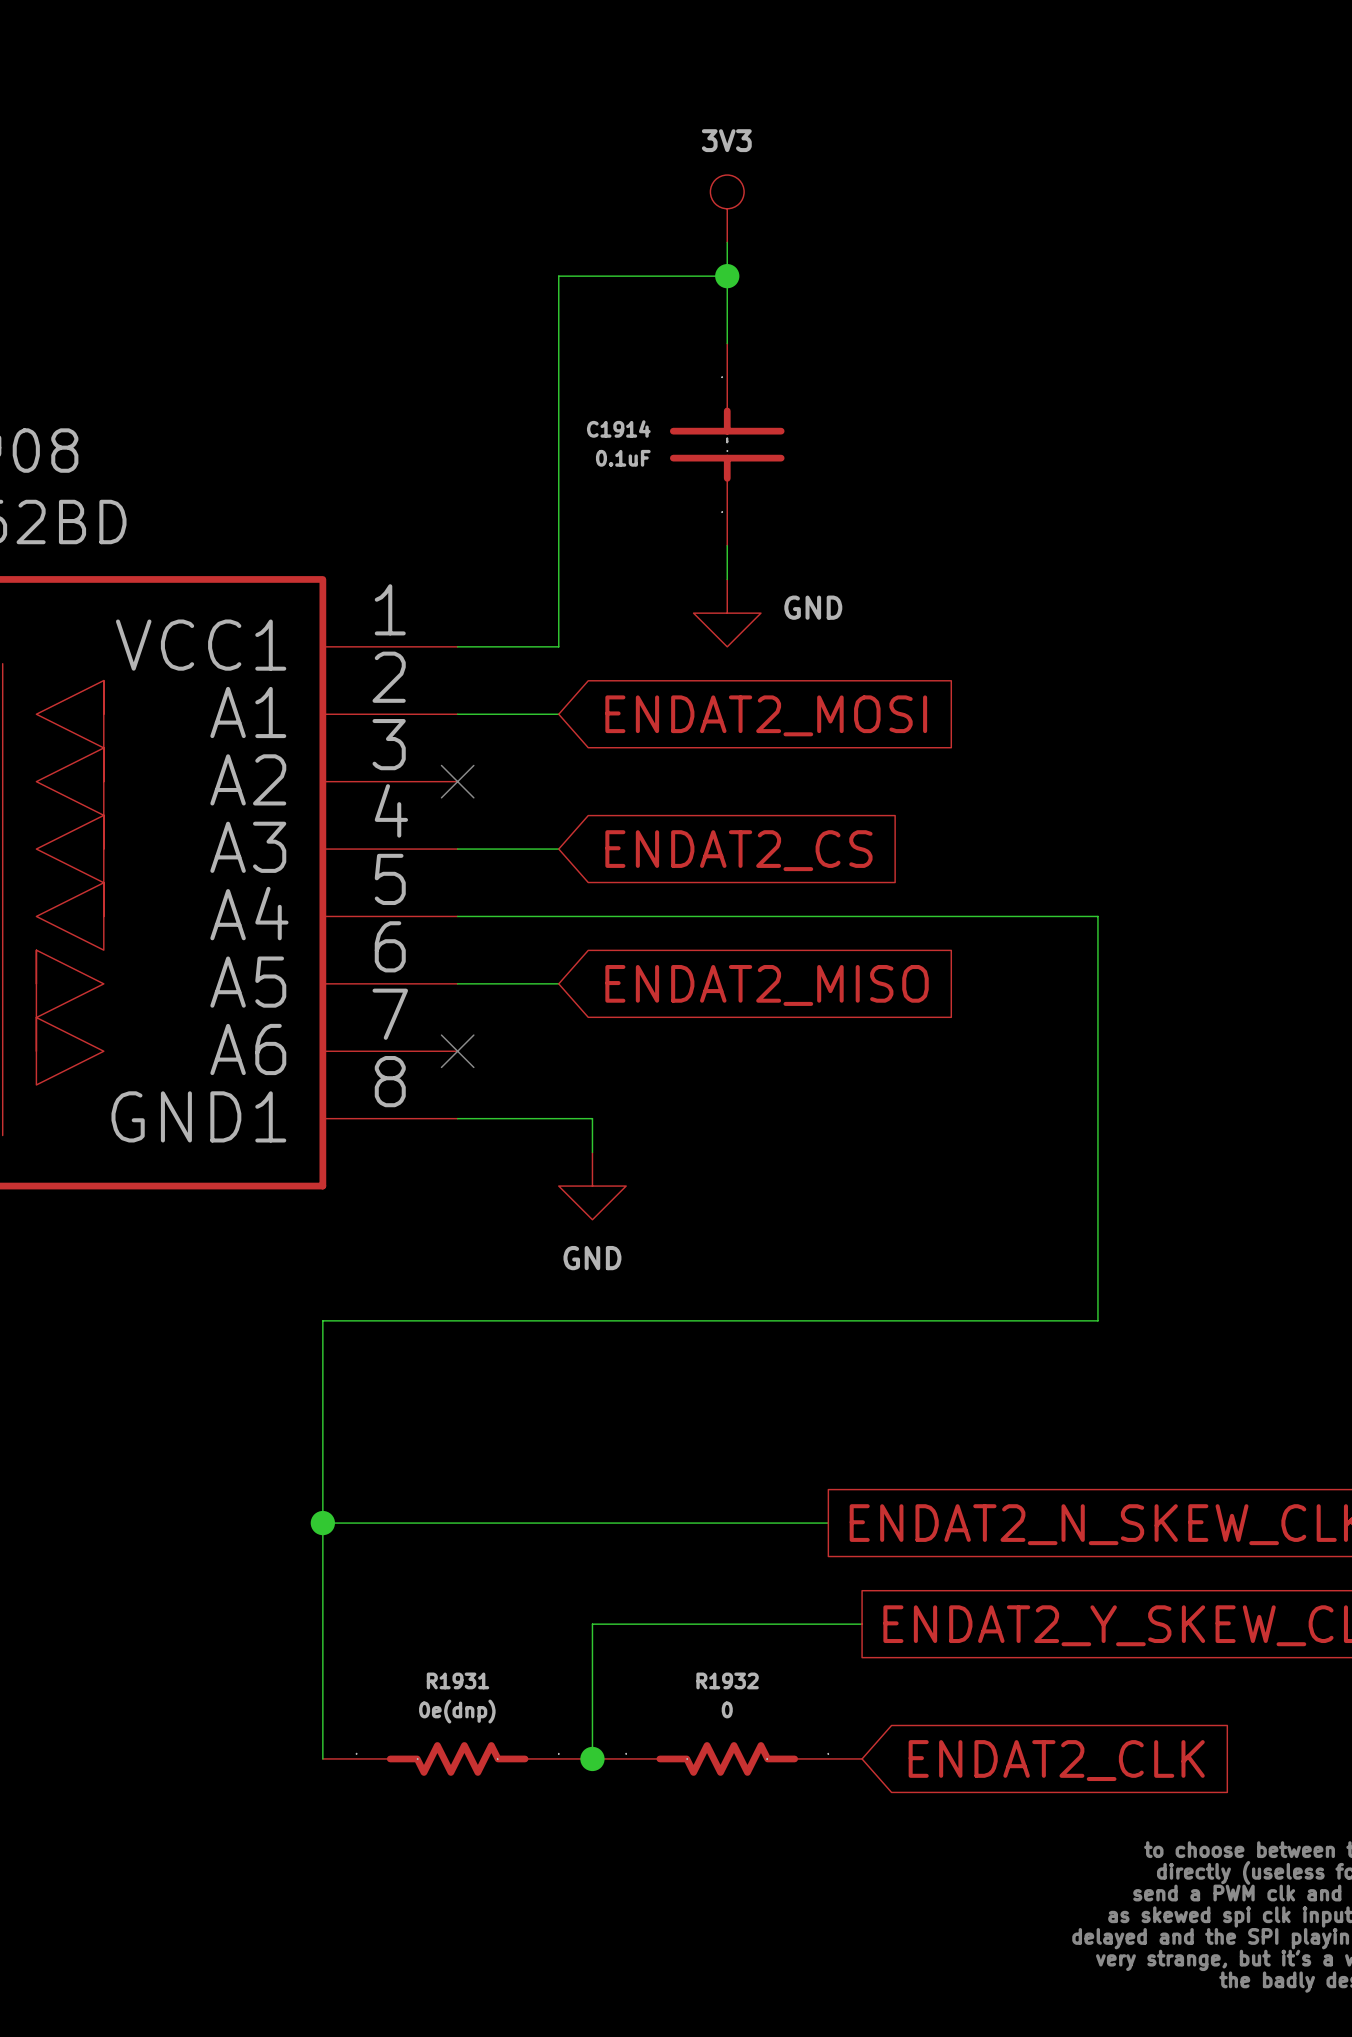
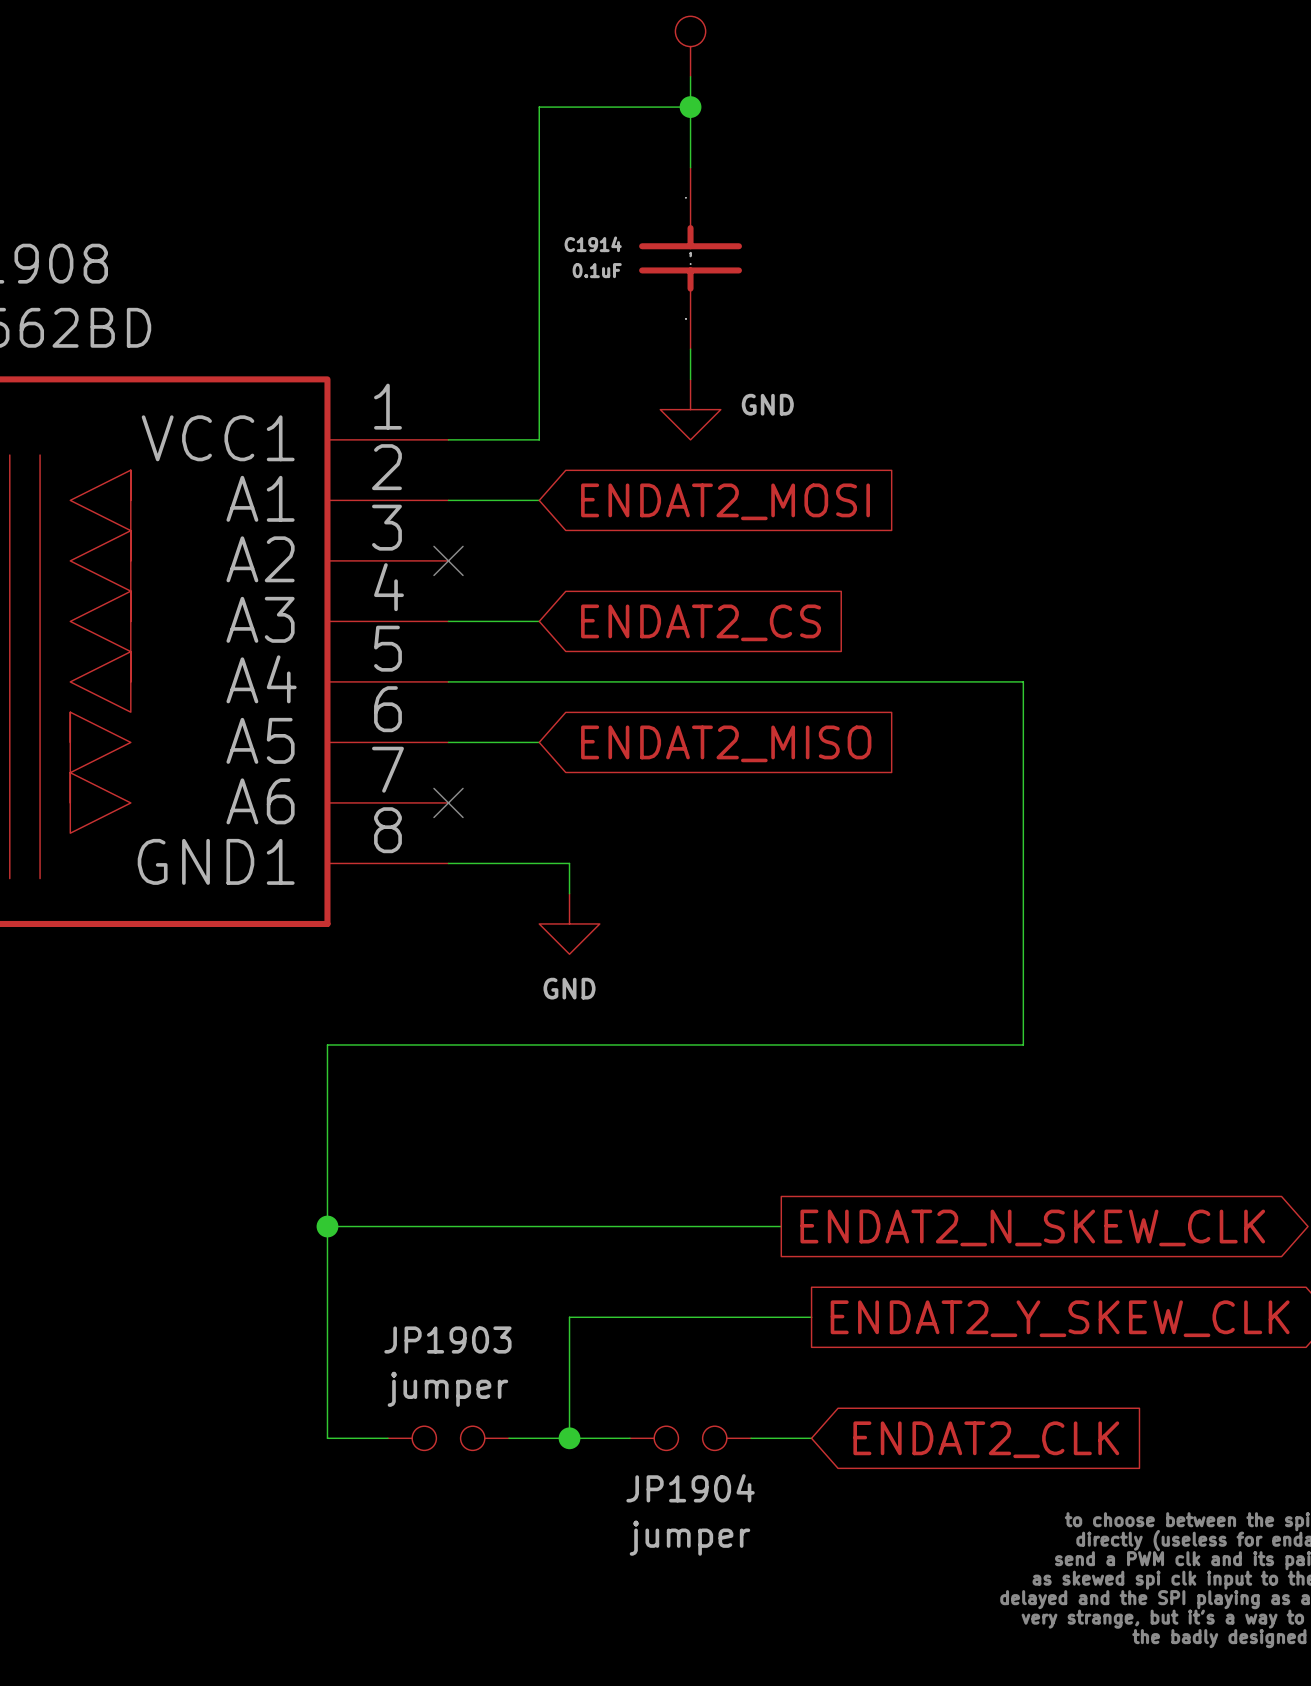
R1931: 0e(dnp) (457, 1758) -> none
JP1903: none -> jumper (448, 1438)
R1932: 0 (727, 1758) -> none
JP1904: none -> jumper (690, 1438)

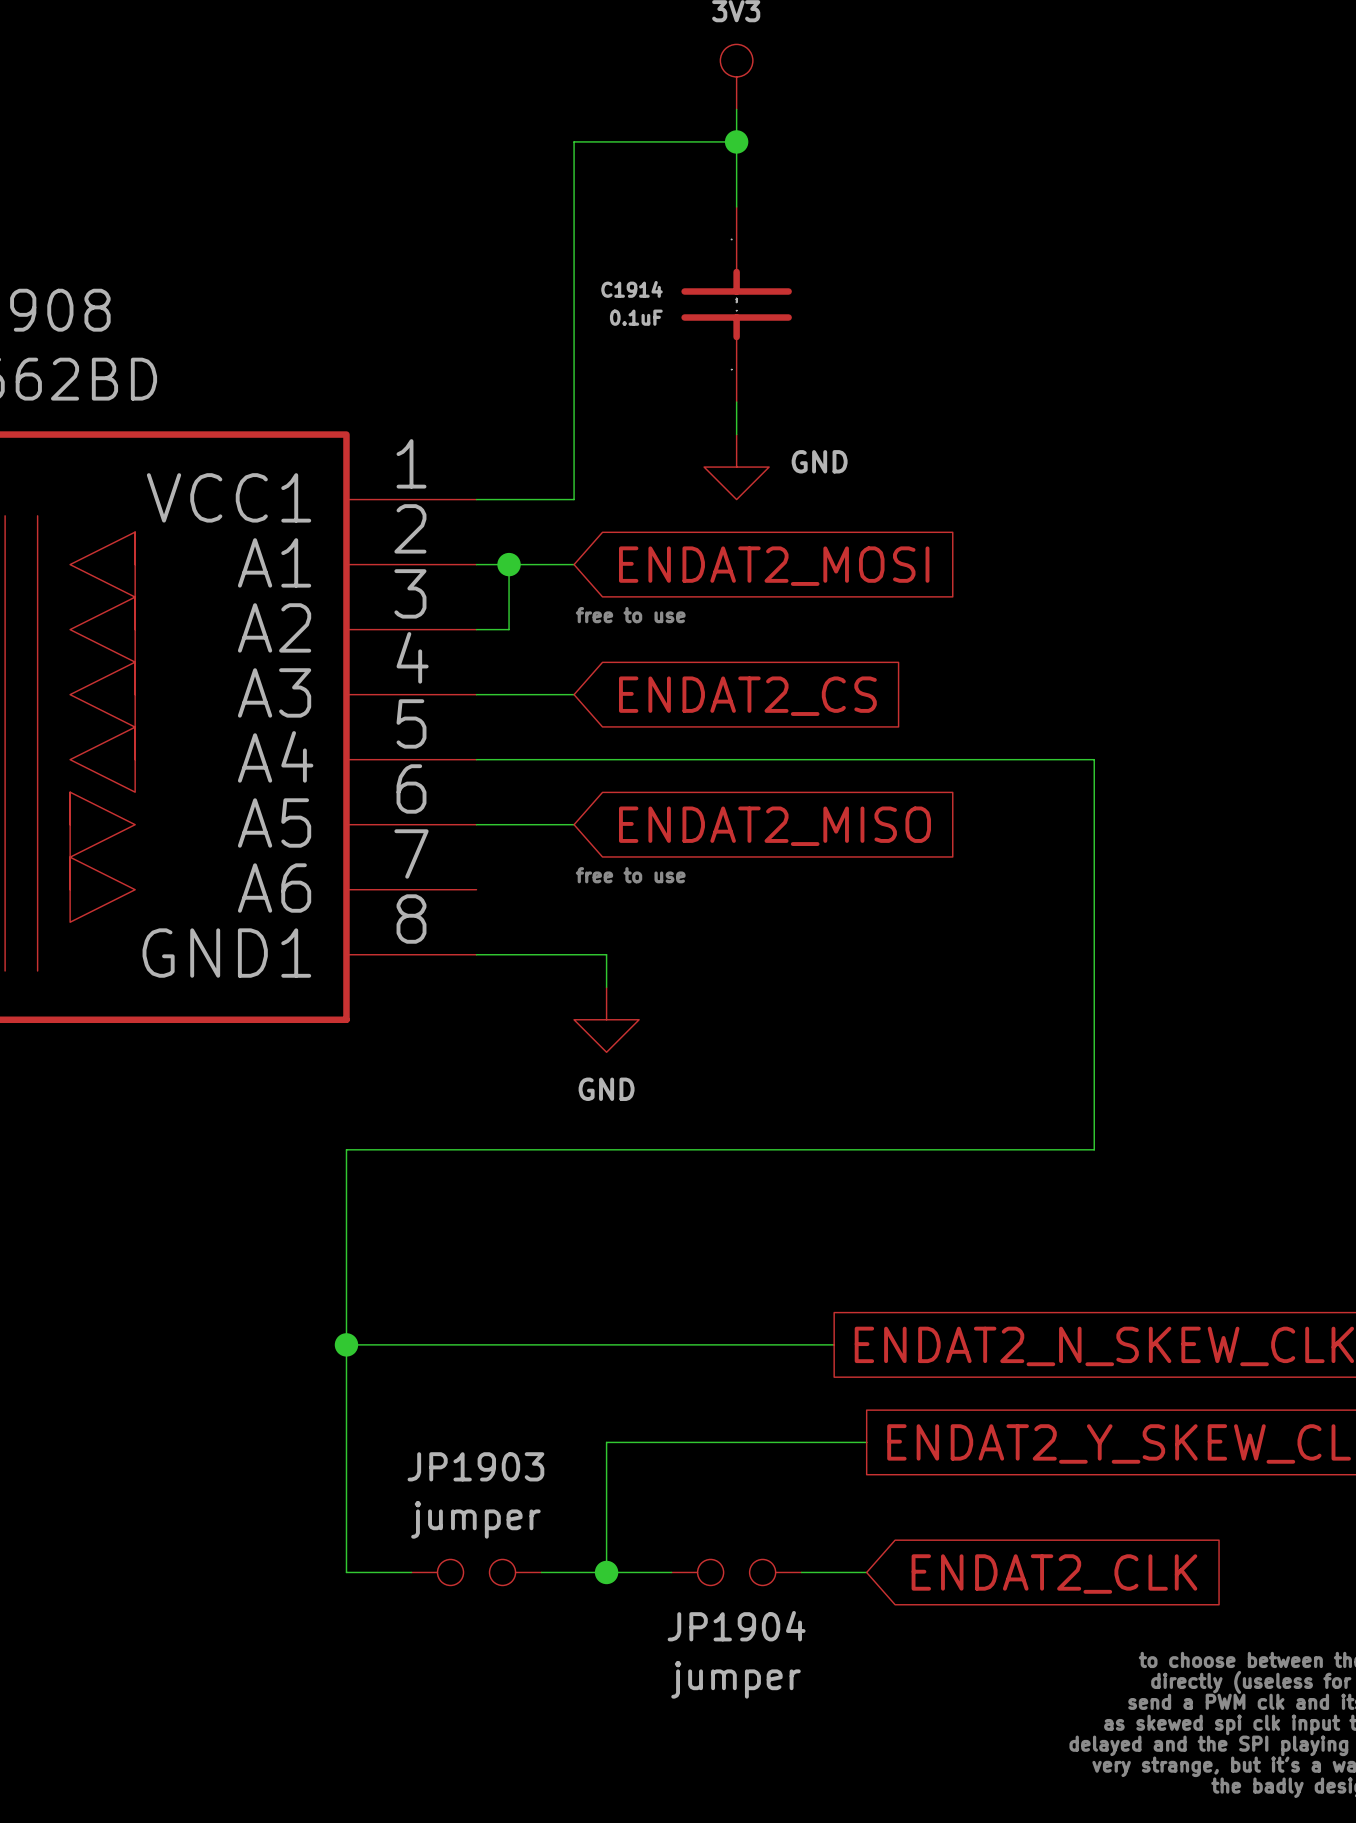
wire: none -> (509, 564) (509, 629) (476, 629)
junction: none -> (509, 564)
text: none -> free to use (630, 615)
no-connect mark: (448, 560) -> none
text: none -> free to use (630, 875)
no-connect mark: (448, 802) -> none

